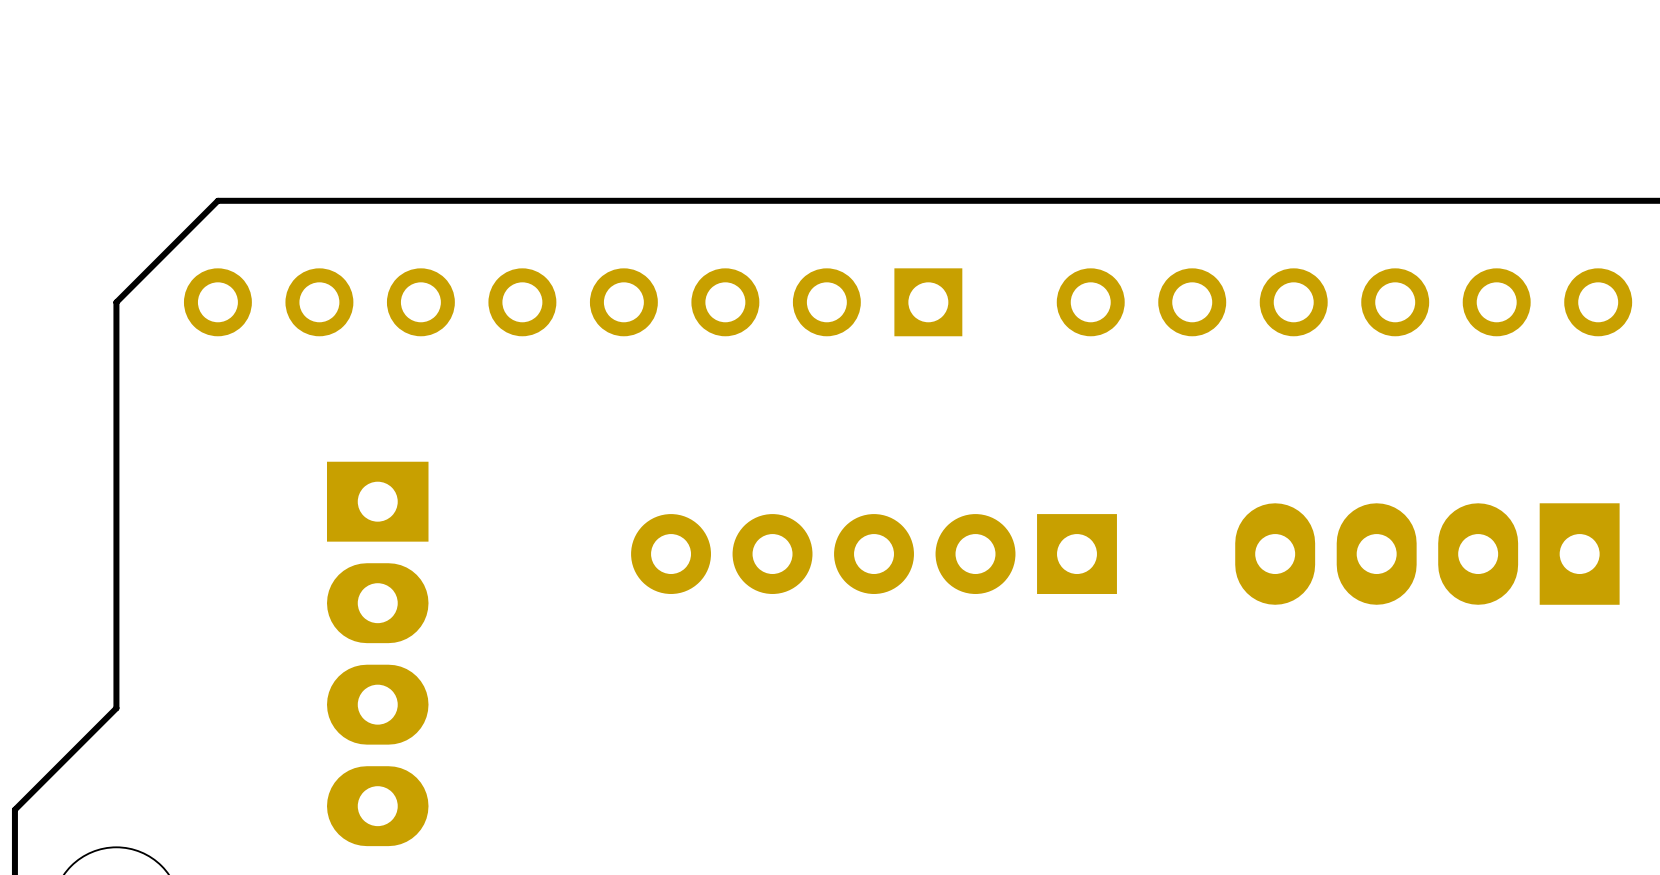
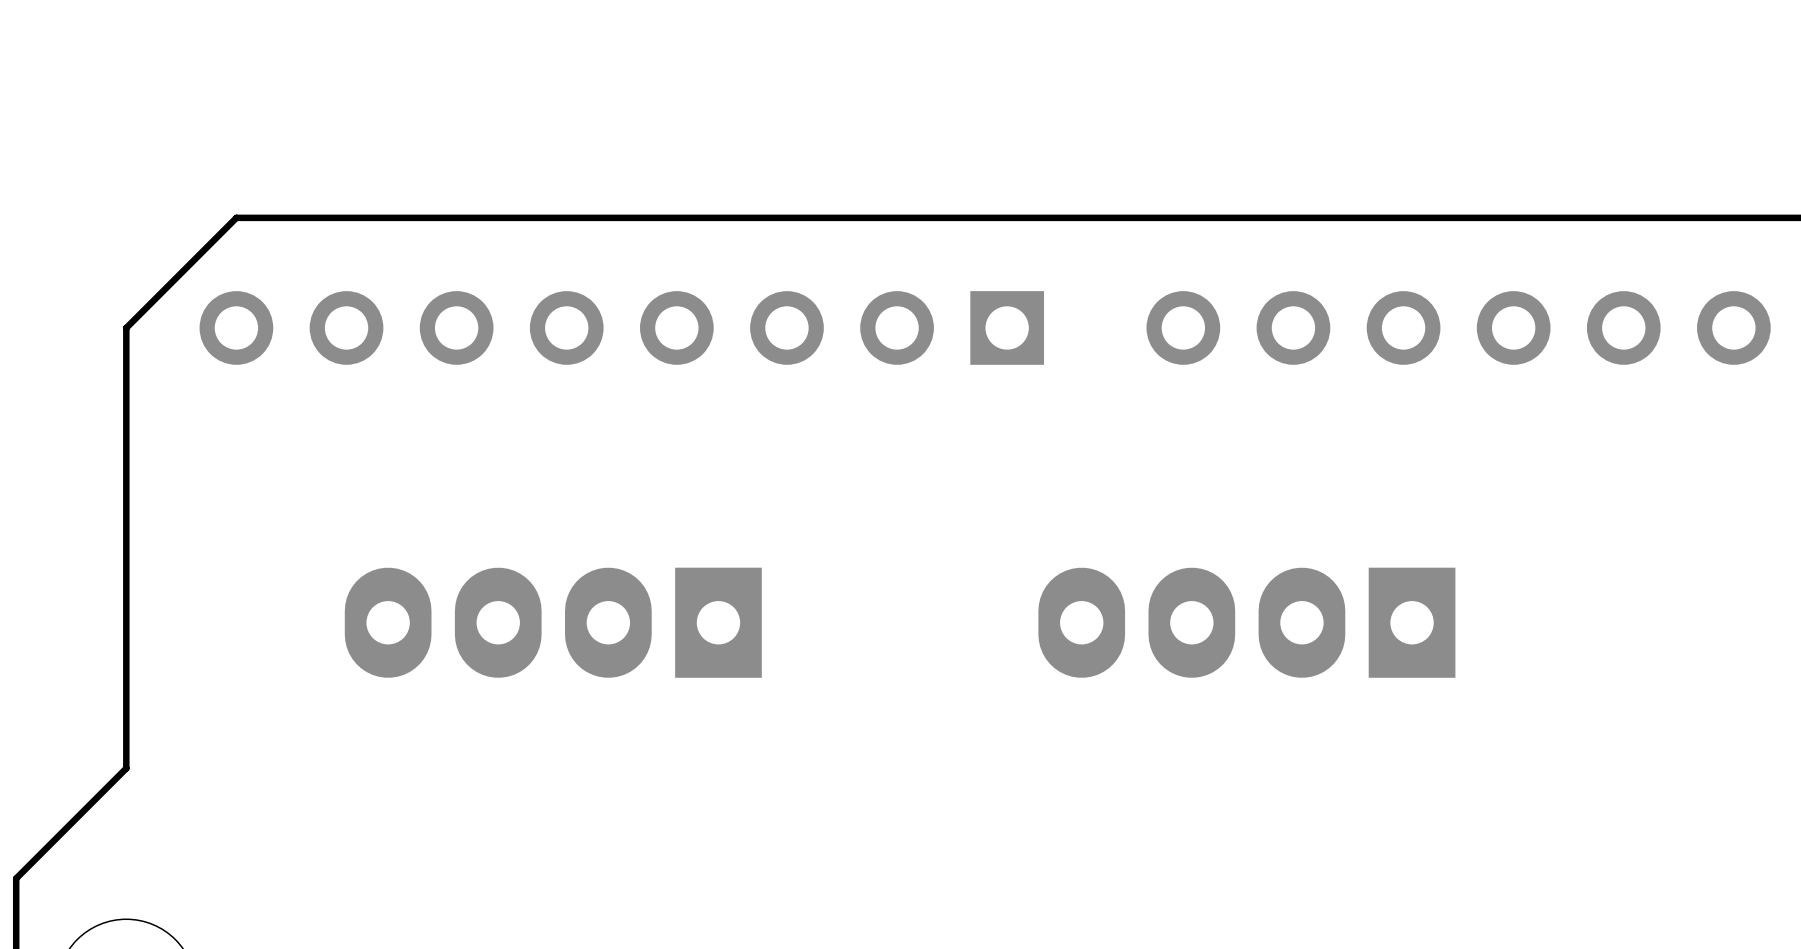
part: (874, 554) -> none
part position: (1427, 554) -> (1246, 622)
part rotation: 0° (377, 653) -> 90° clockwise (553, 622)

